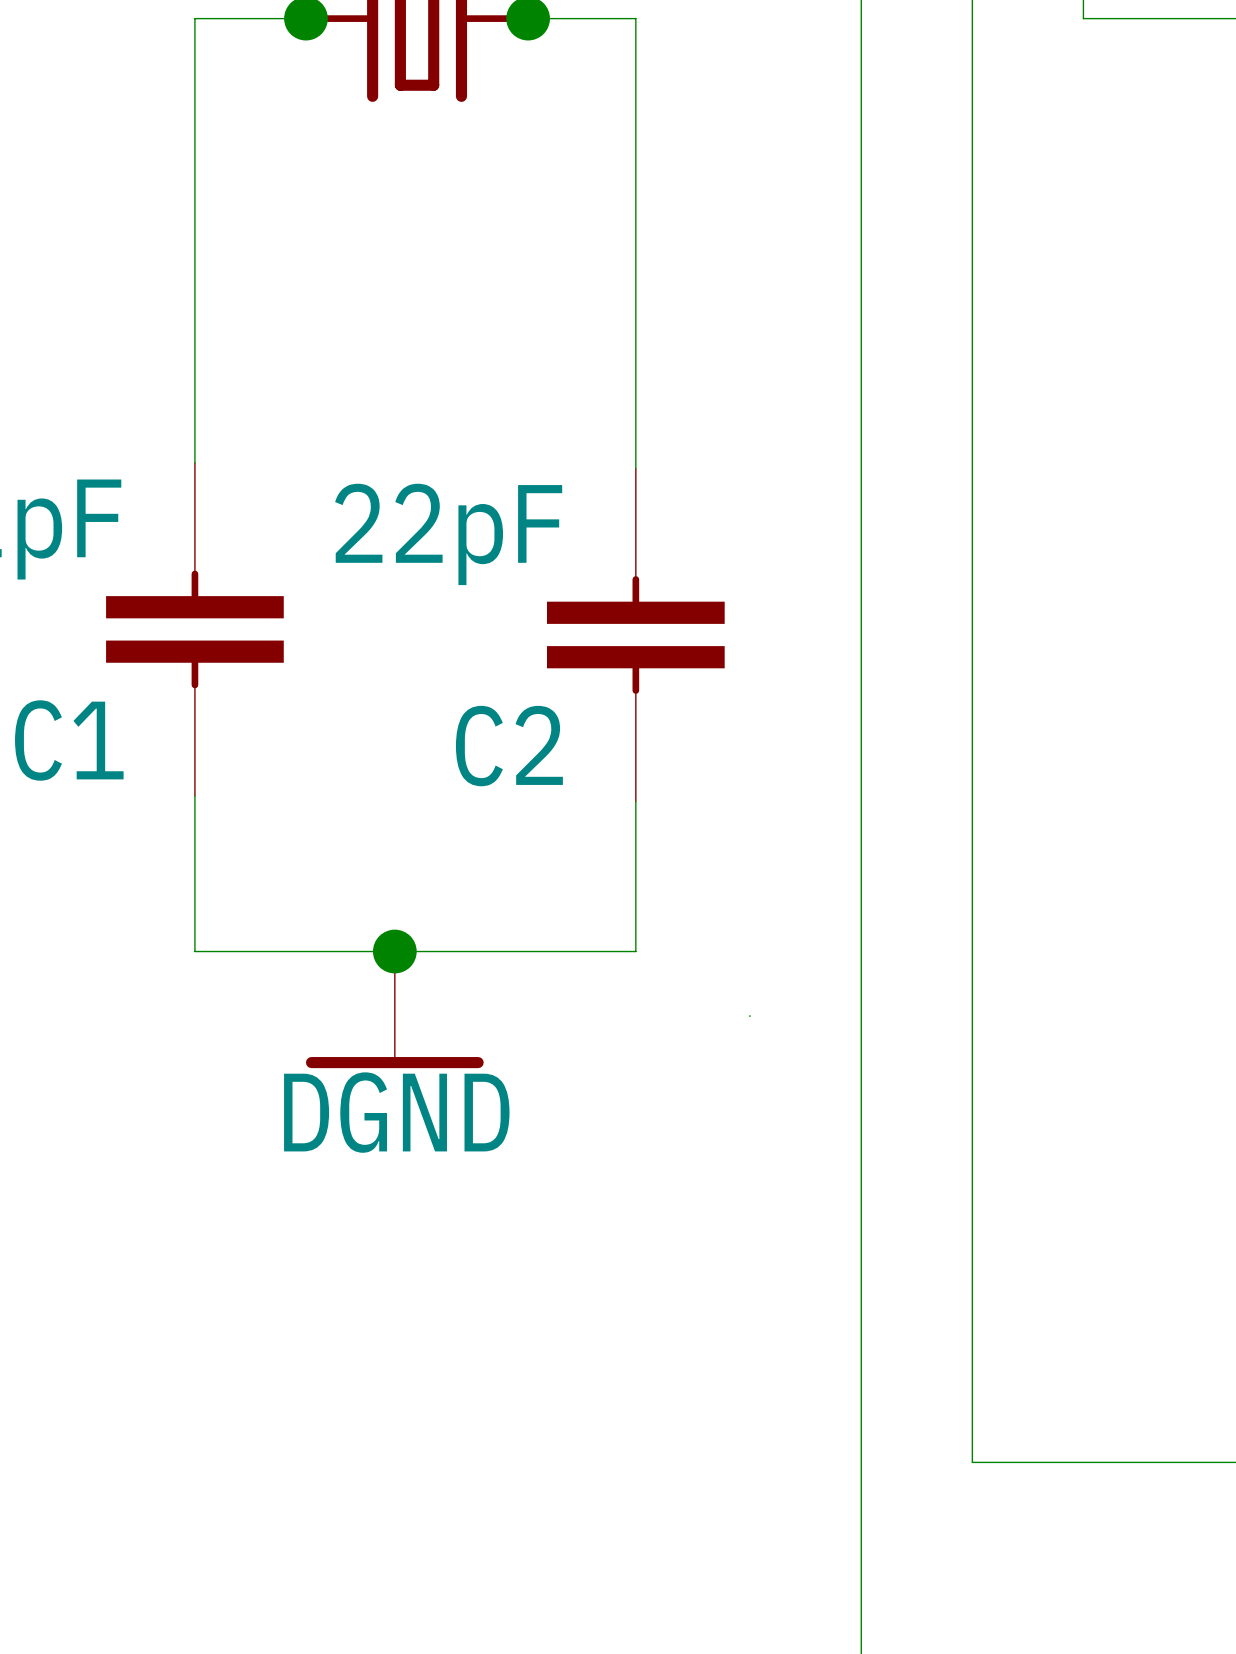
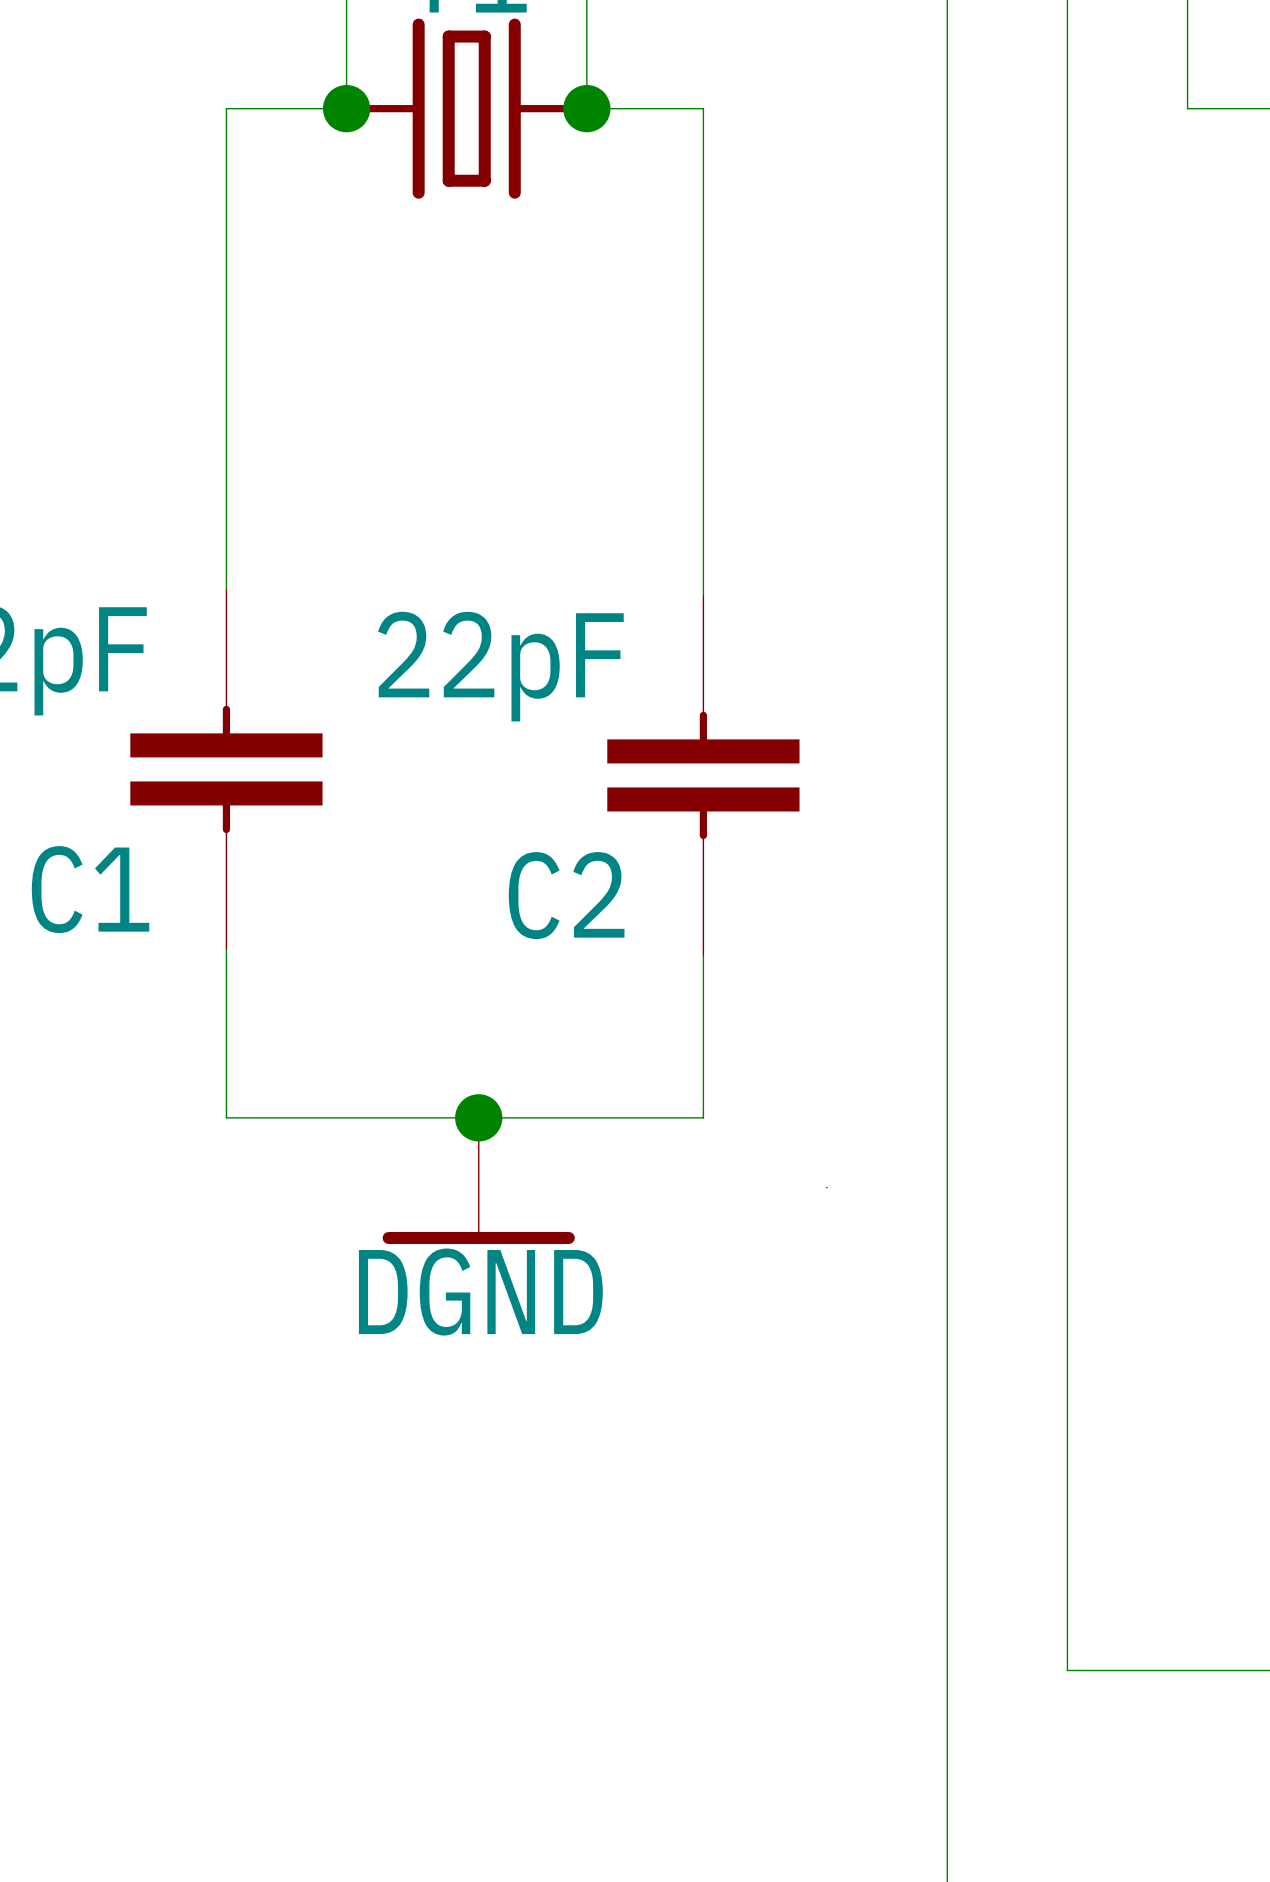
junction position: (394, 951) -> (478, 1117)
power symbol position: DGND (394, 1009) -> DGND (478, 1180)

